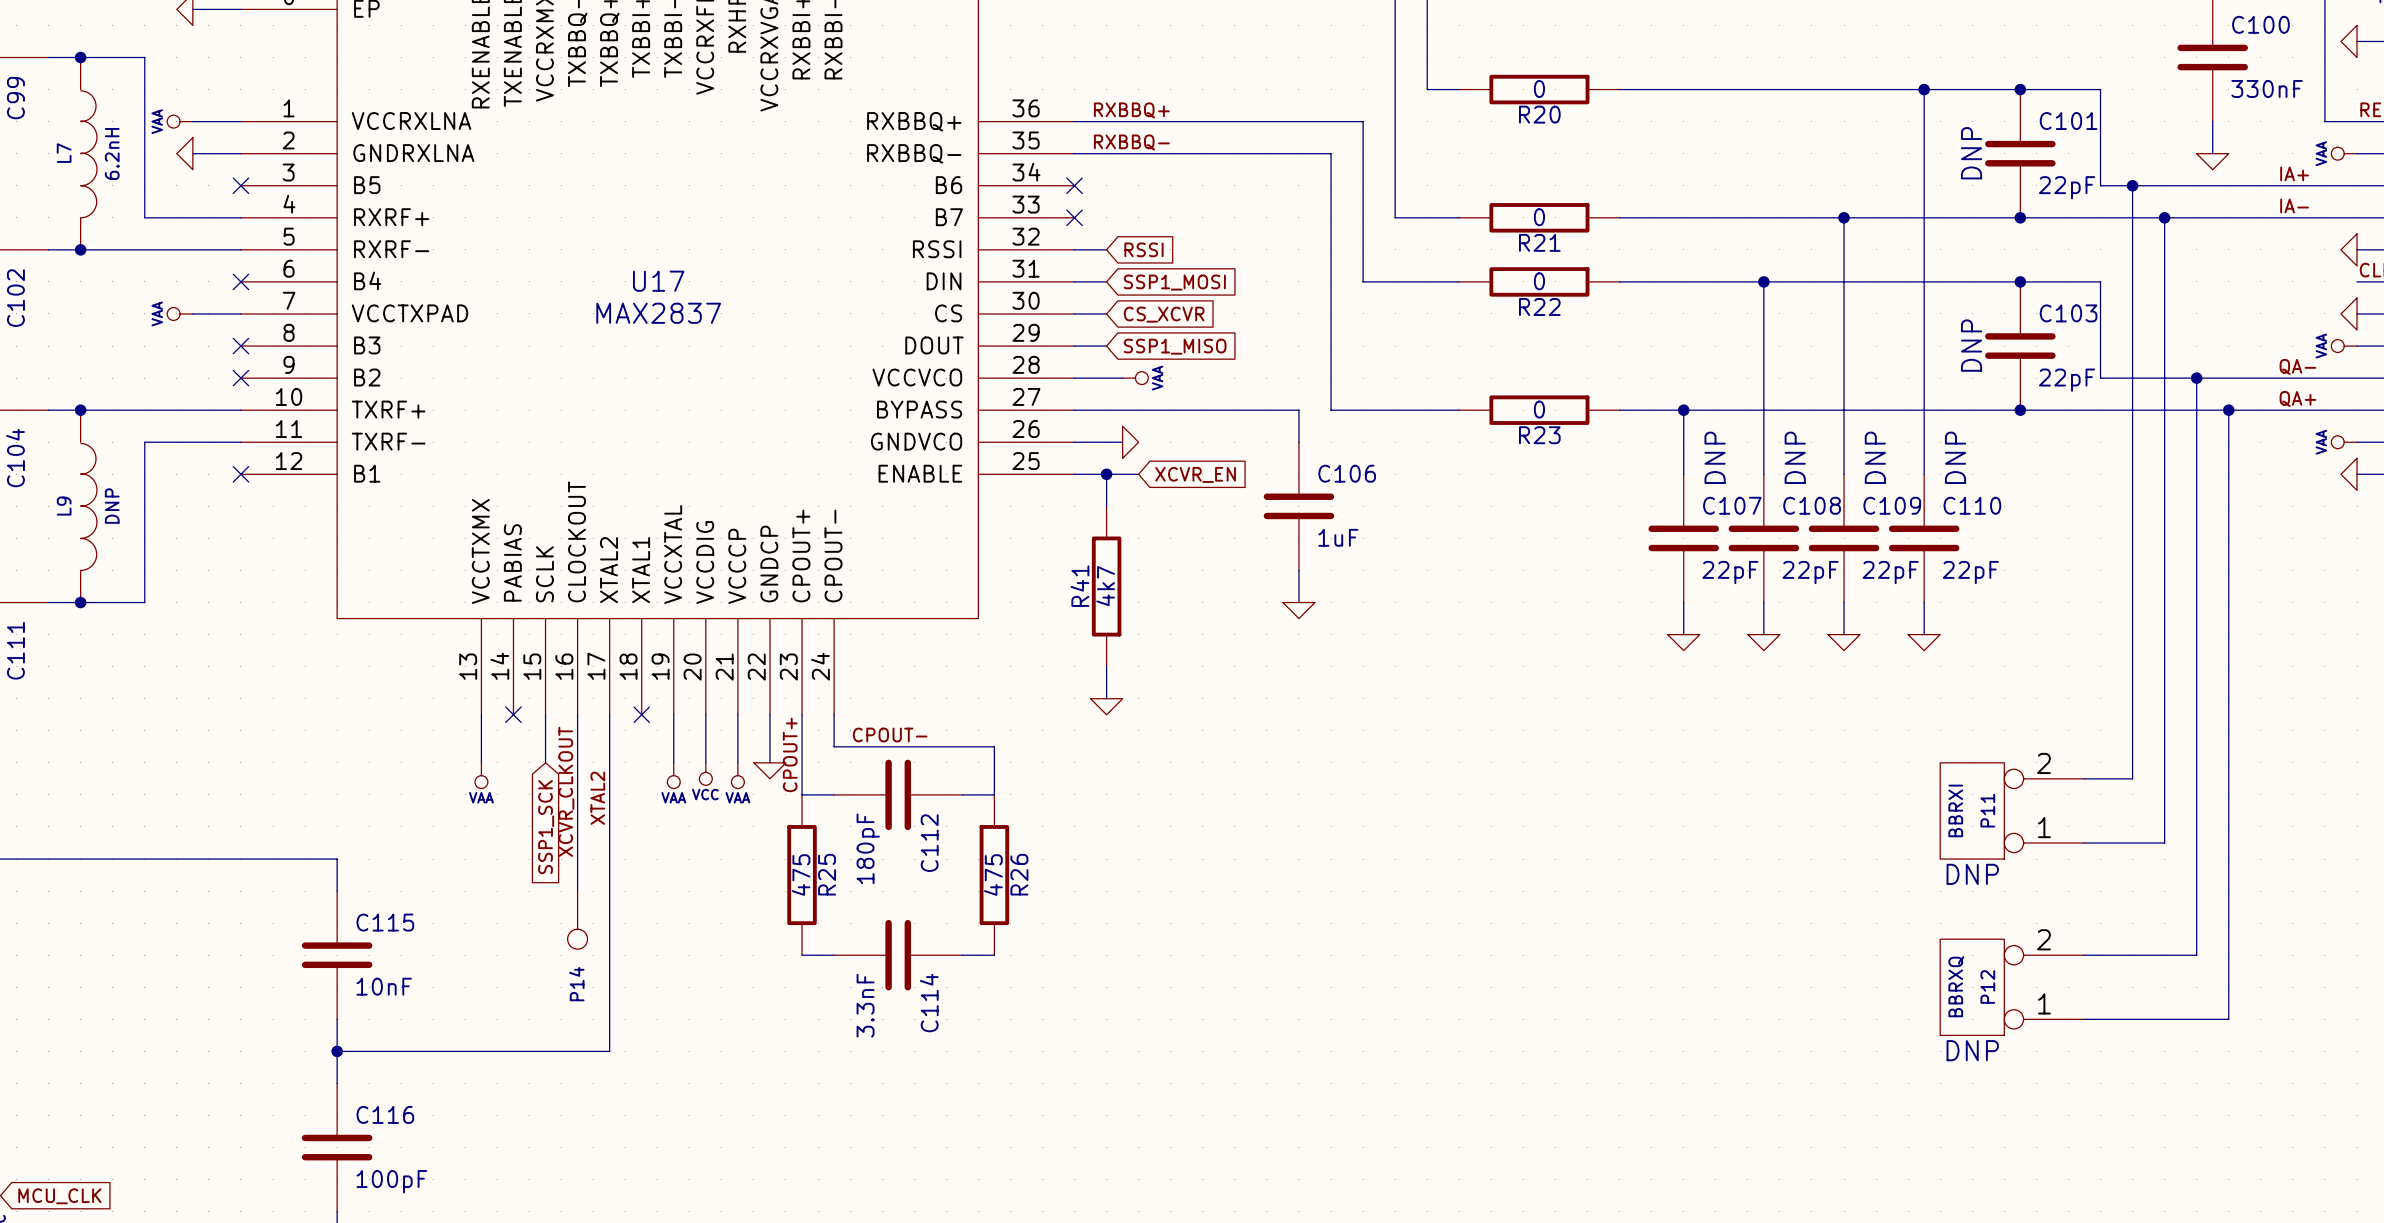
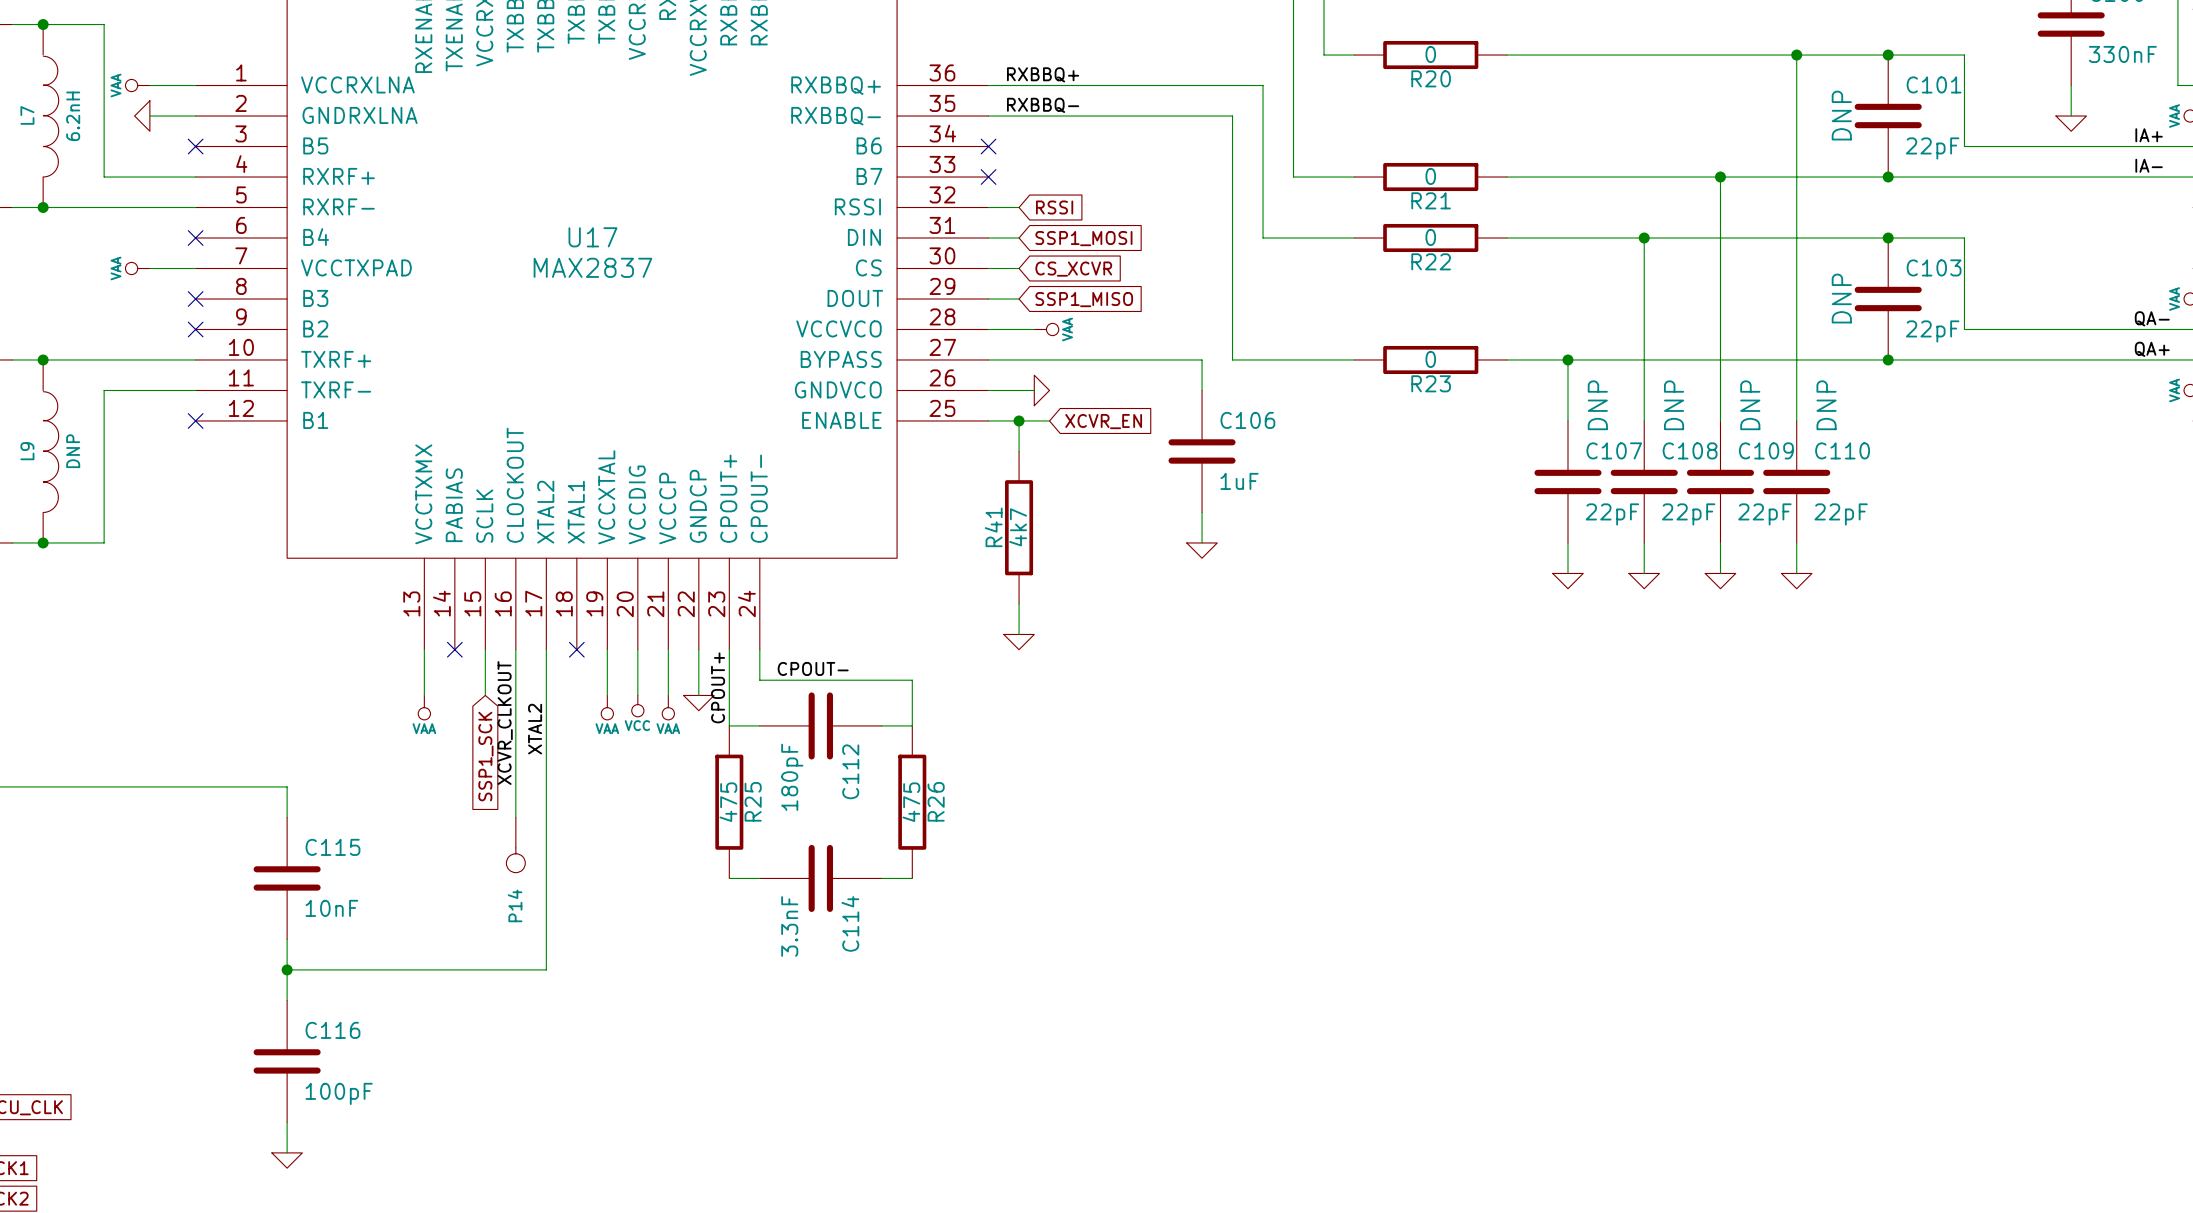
wire: (2132, 185) (2132, 778) (2084, 778) -> none
junction: (2132, 185) -> none
wire: (2164, 217) (2164, 843) (2084, 843) -> none
junction: (2164, 217) -> none
wire: (2196, 378) (2196, 955) (2084, 955) -> none
junction: (2196, 378) -> none
wire: (2228, 410) (2228, 1019) (2084, 1019) -> none
junction: (2228, 410) -> none
P11: BBRXI (2012, 810) -> none
P12: BBRXQ (2012, 987) -> none

